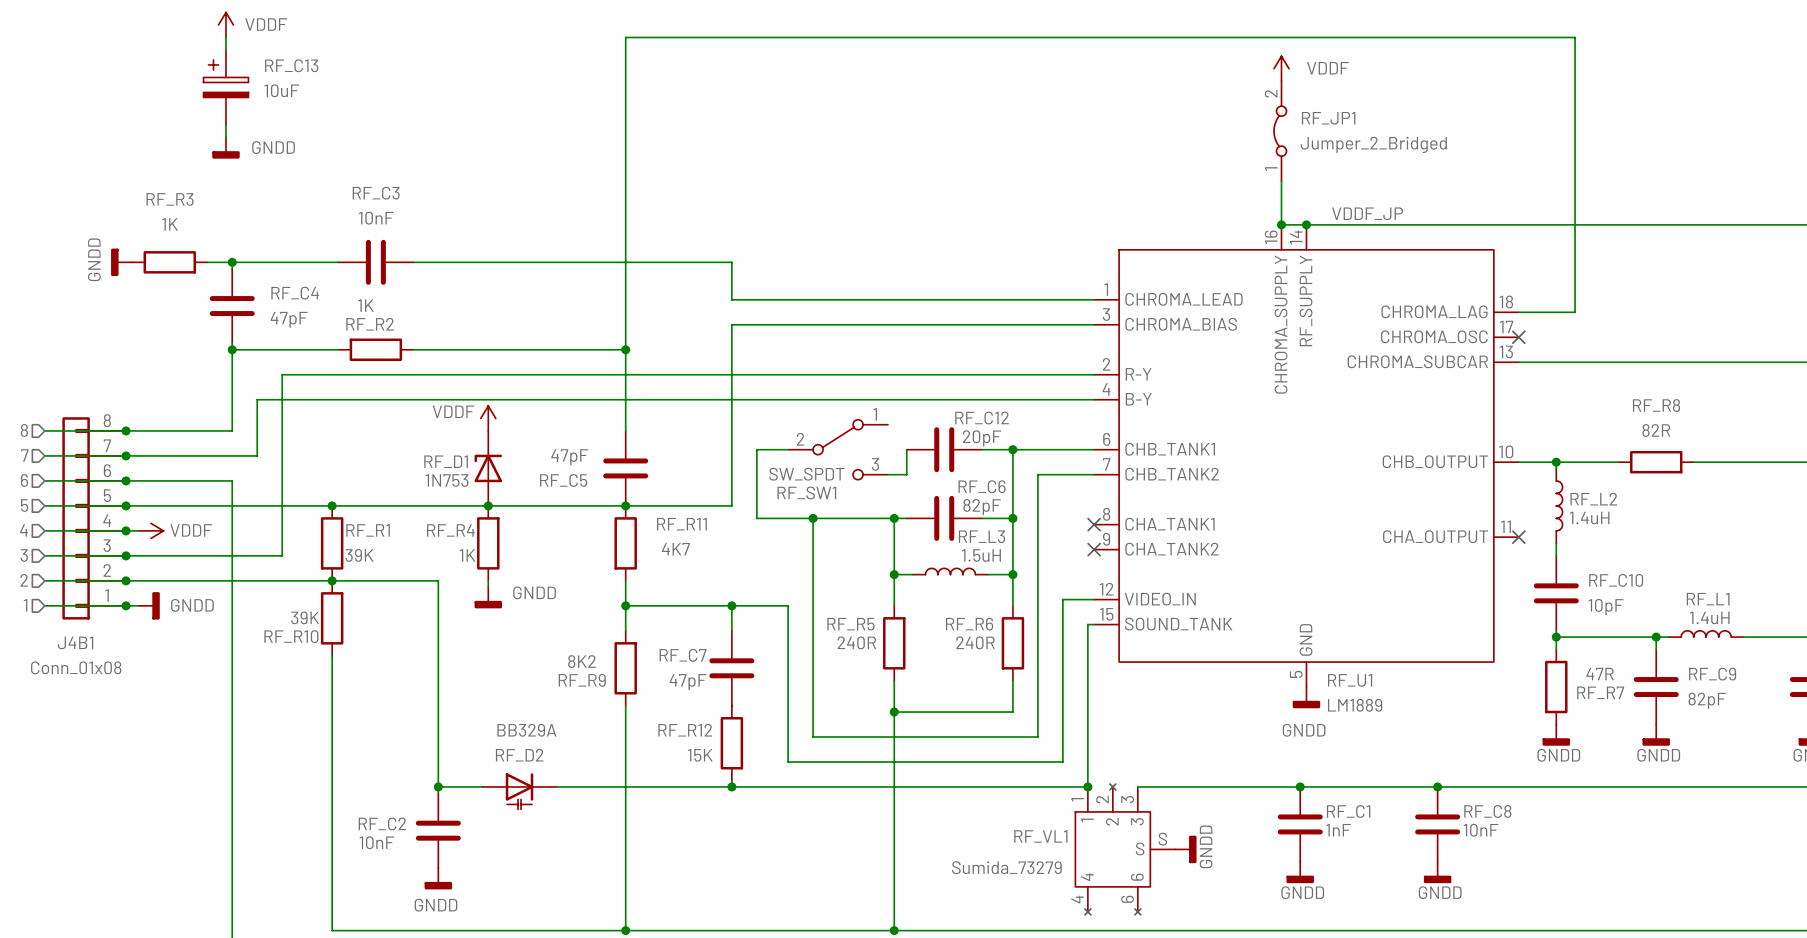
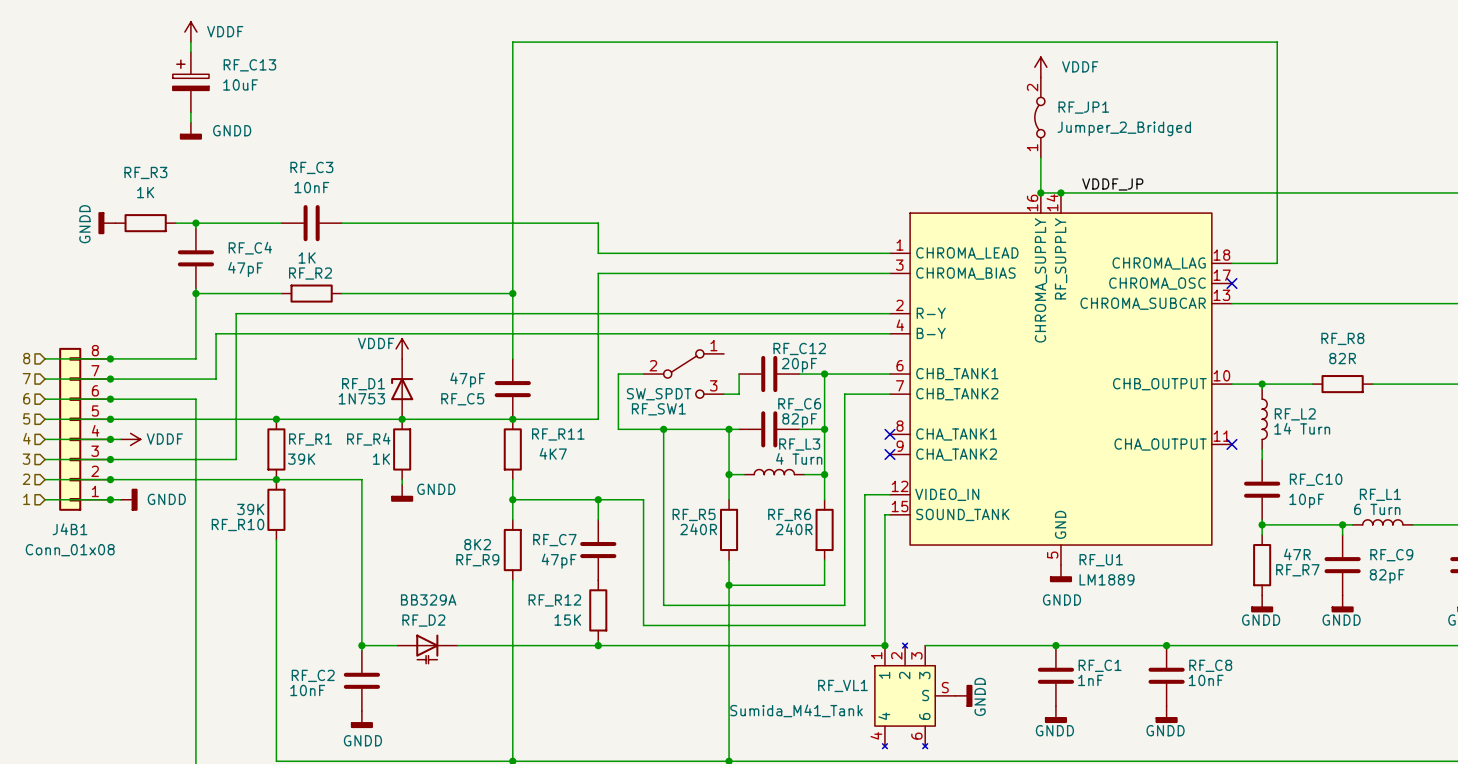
RF_L2 value: 1.4uH (1589, 518) -> 14 Turn (1302, 428)
RF_L3 value: 1.5uH (981, 555) -> 4 Turn (799, 458)
RF_L1 value: 1.4uH (1709, 617) -> 6 Turn (1377, 509)
RF_VL1 value: Sumida_73279 (1006, 867) -> Sumida_M41_Tank (796, 710)

